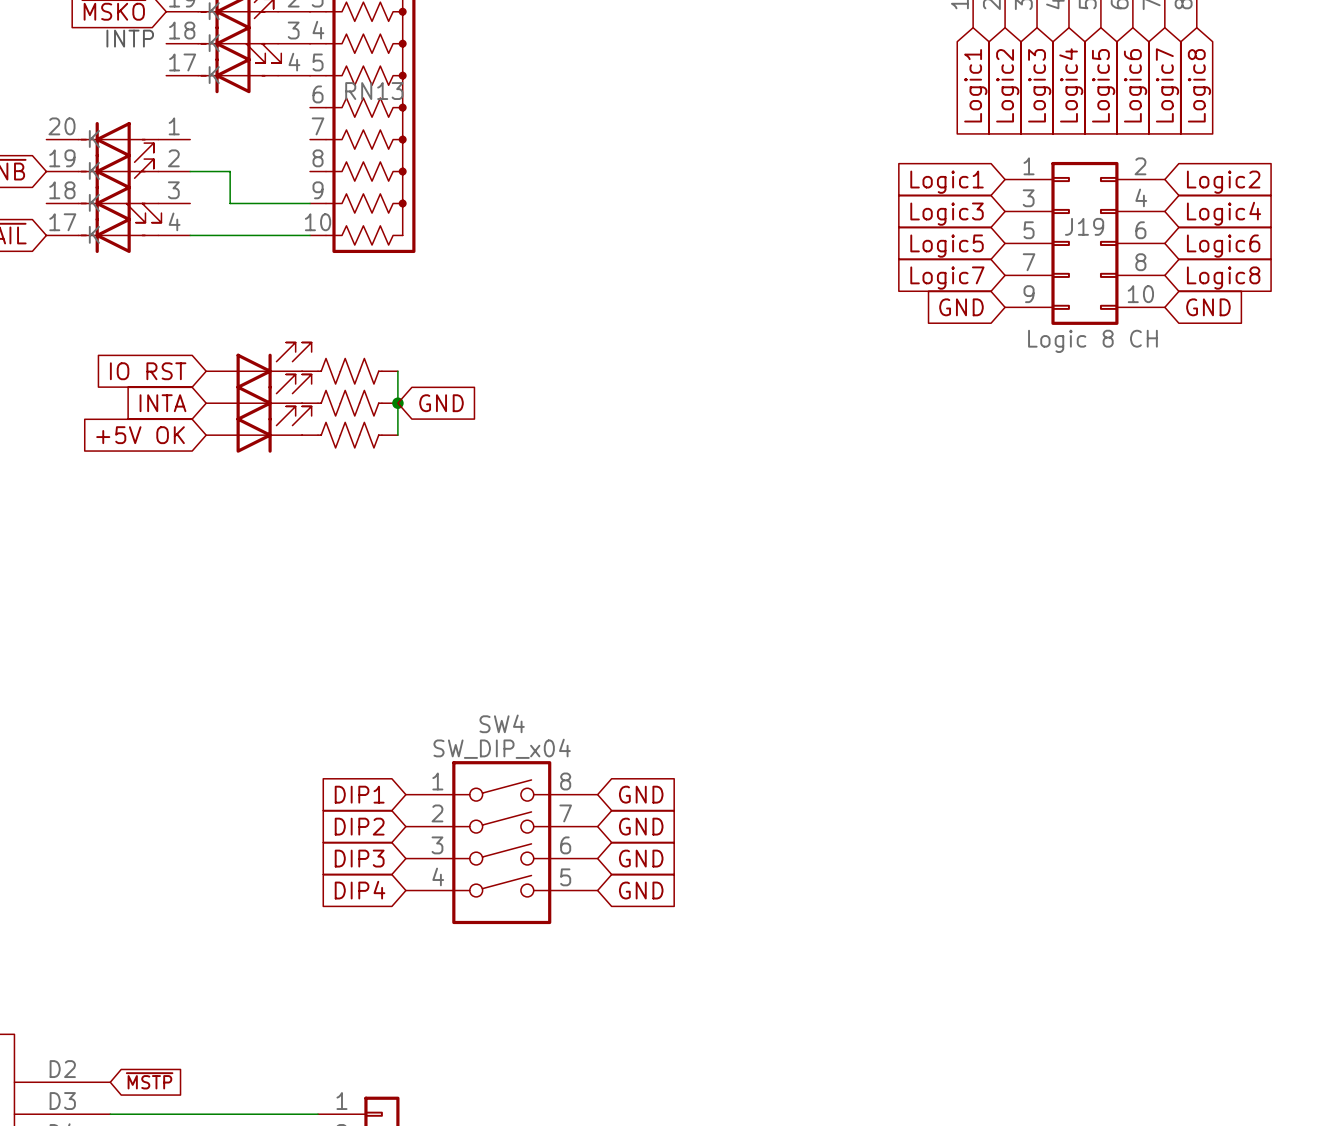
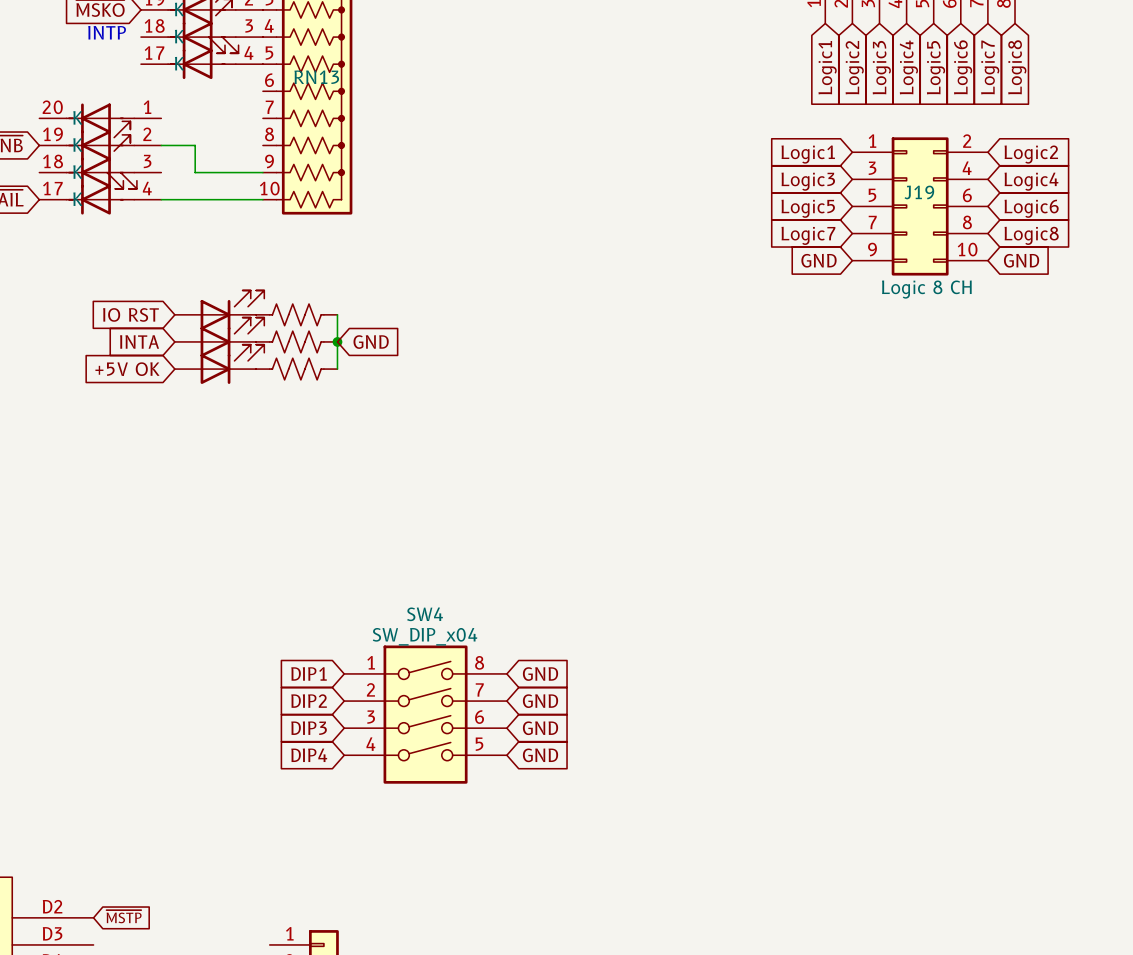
wire: (110, 1114) (318, 1114) -> none

